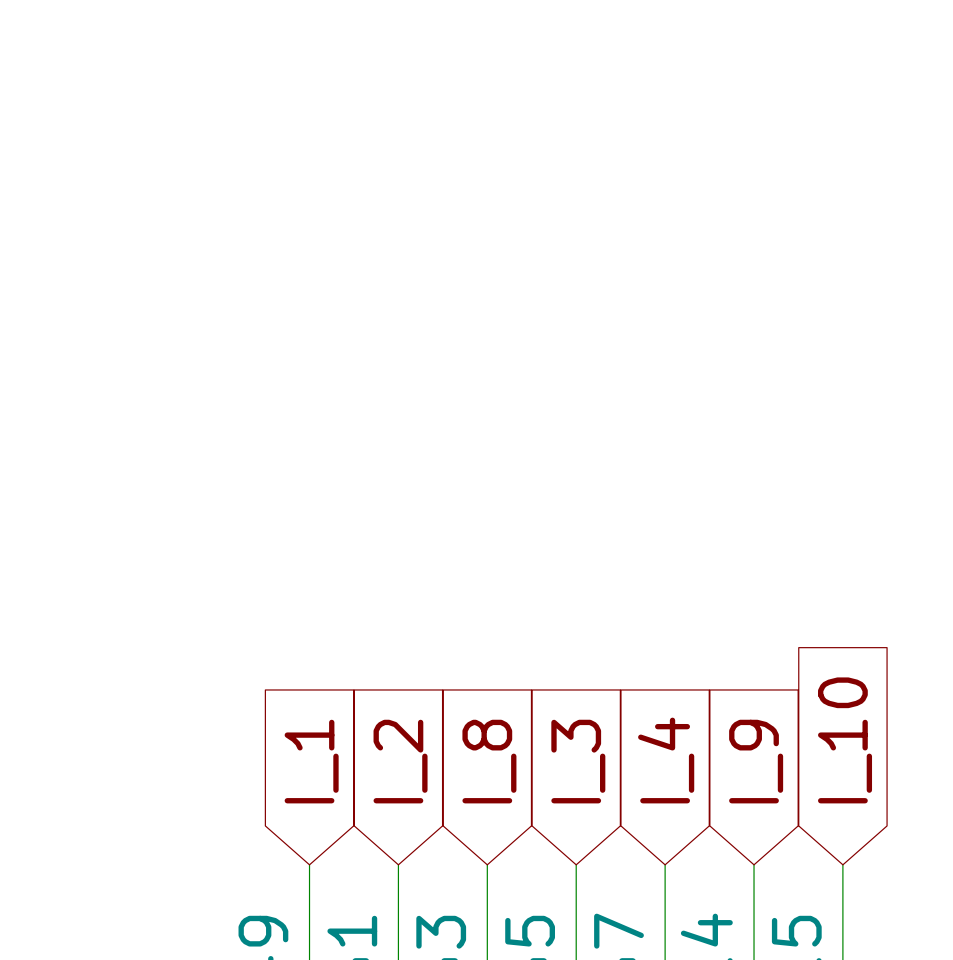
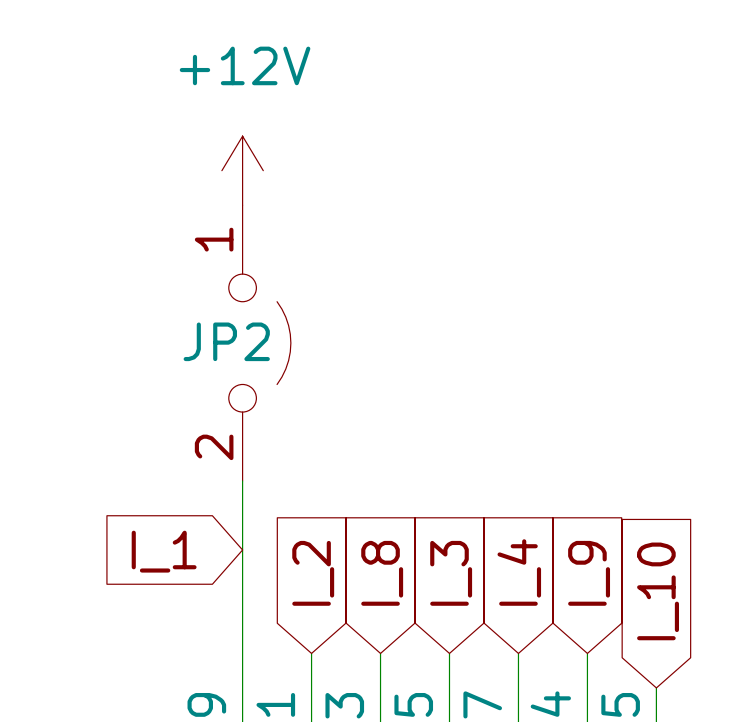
power symbol: none -> +12V (242, 170)
JP2: none -> (259, 343)
wire: none -> (242, 481) (242, 653)
global label position: I_10 (845, 740) -> I_10 (658, 591)
global label rotation: 0° (311, 761) -> 90° counterclockwise (164, 551)
wire: (842, 864) (842, 909) -> none

